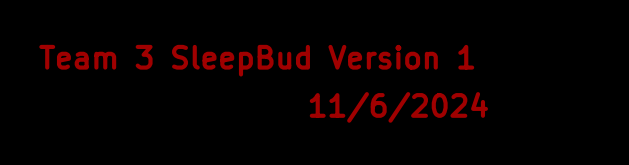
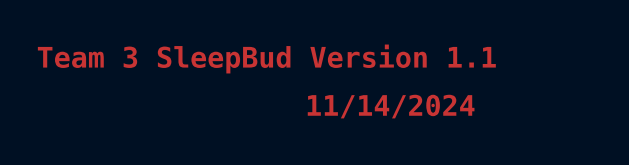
text: Team 3 SleepBud Version 1 (256, 60) -> Team 3 SleepBud Version 1.1 (266, 59)
text: 11/6/2024 (398, 107) -> 11/14/2024 (391, 106)

